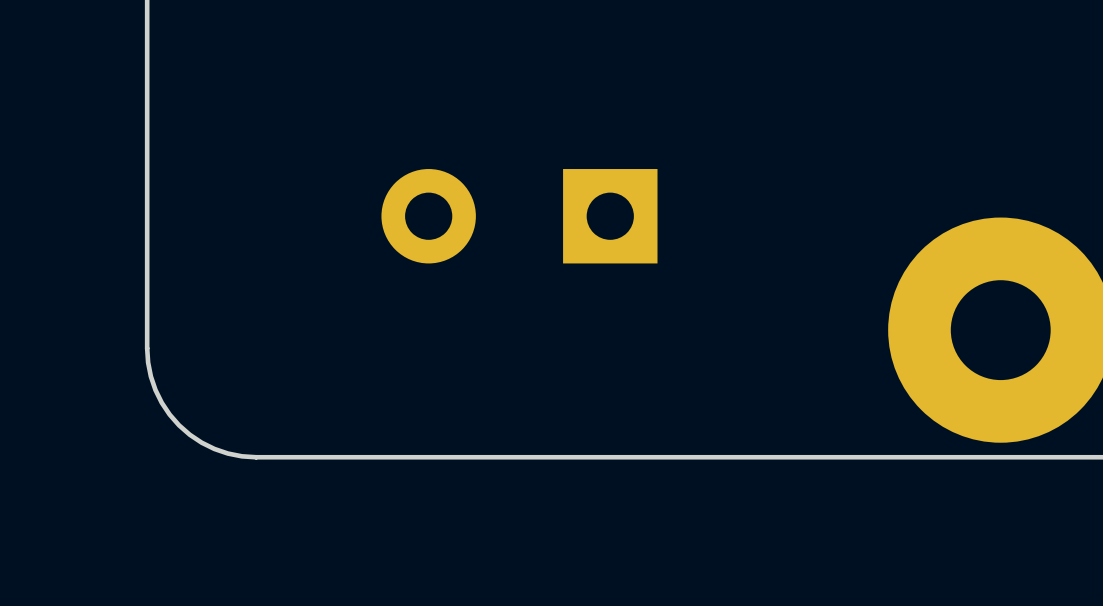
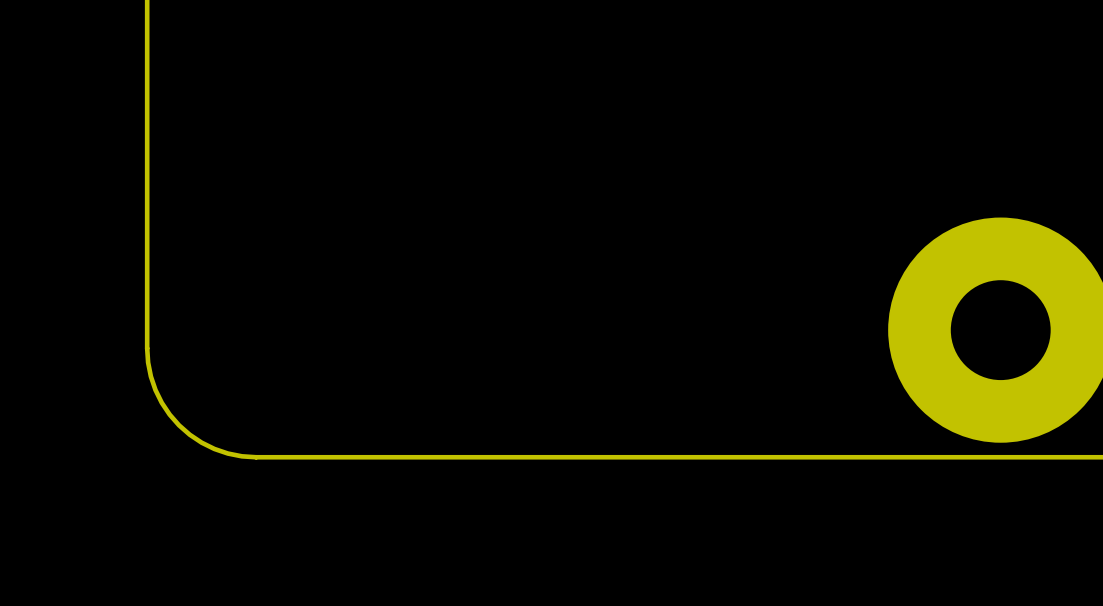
part: (519, 216) -> none

